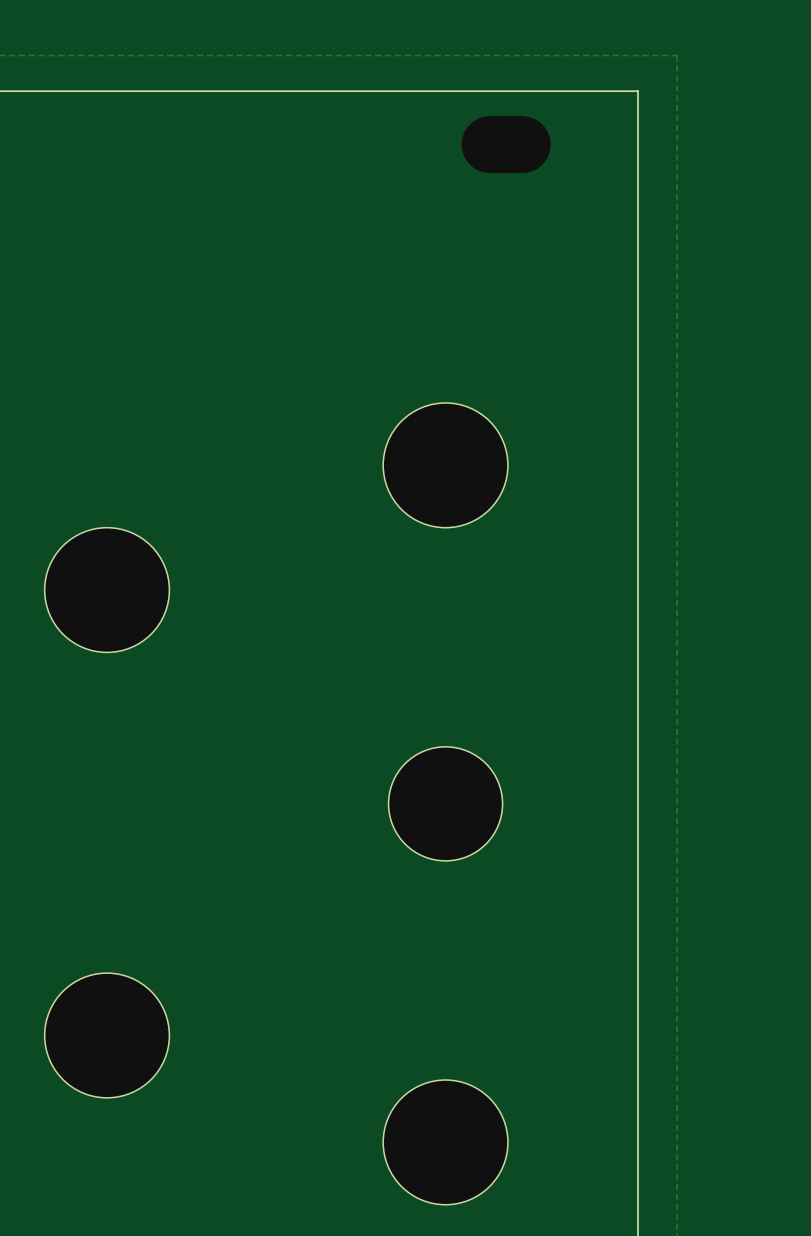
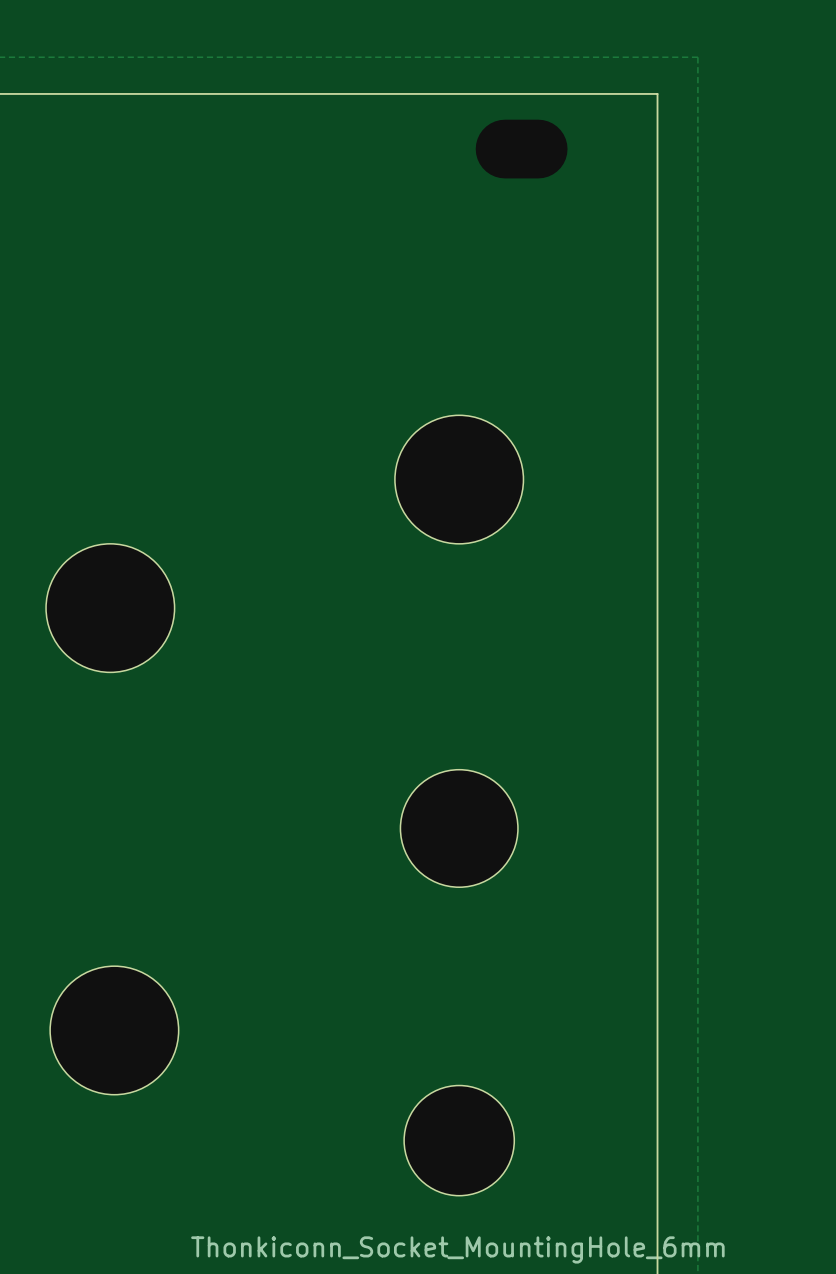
part position: (107, 1035) -> (114, 1030)
part: none -> Thonkiconn_Socket_MountingHole_6mm (459, 1140)
part: (445, 1142) -> none

